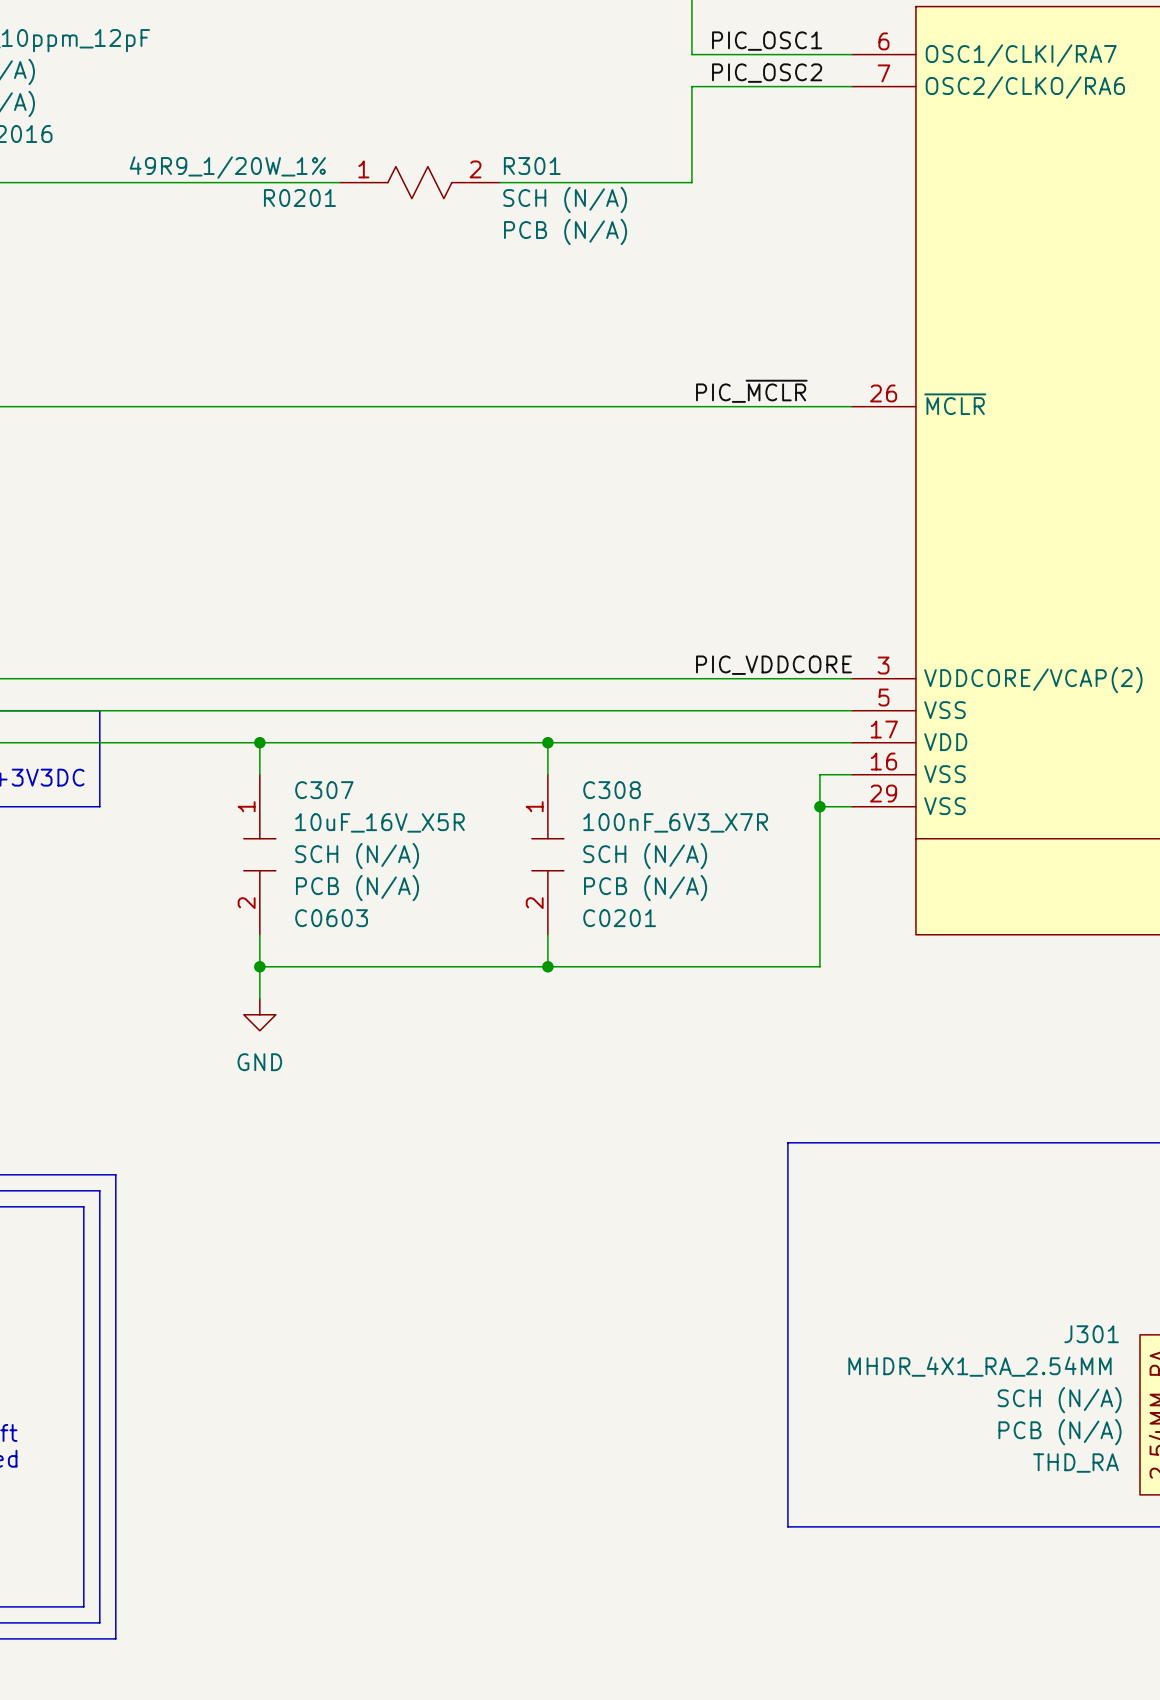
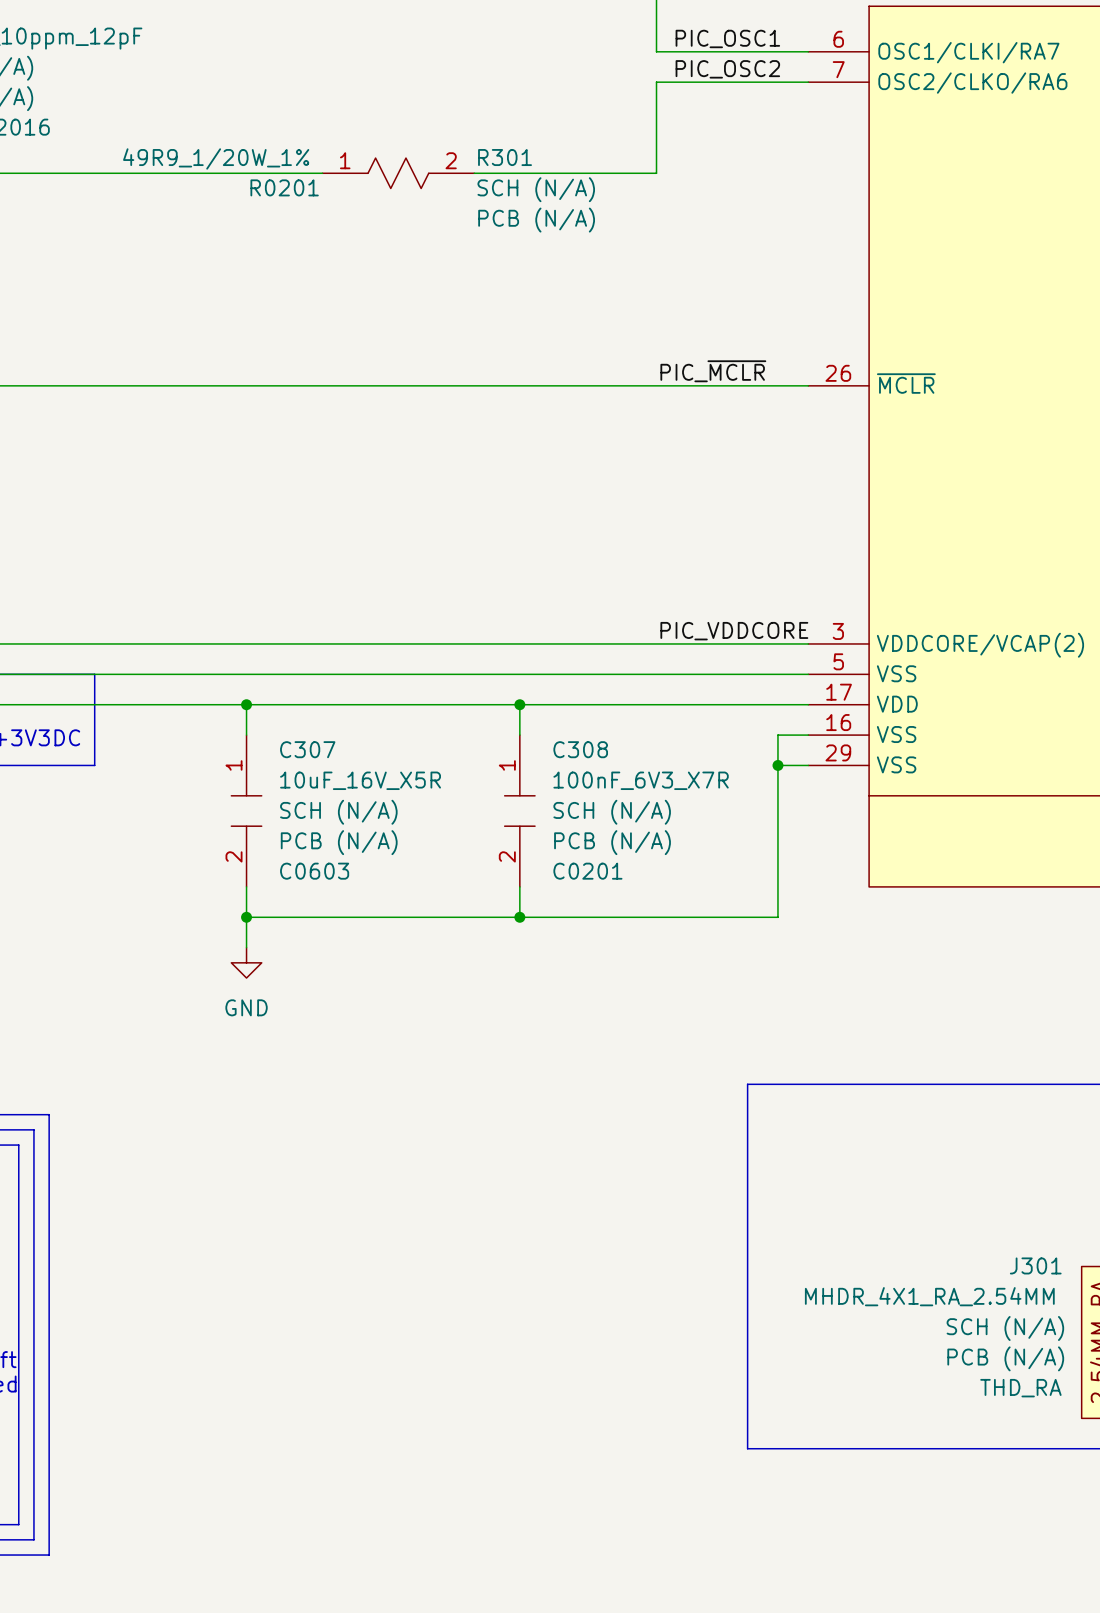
line: (51, 1174) (115, 1174) (115, 1638) (51, 1638) -> (49, 1114) (49, 1555)
line: (35, 1190) (99, 1190) (99, 1622) (35, 1622) -> (33, 1129) (33, 1539)
line: (19, 1206) (83, 1206) (83, 1606) (19, 1606) -> (18, 1145) (18, 1524)

